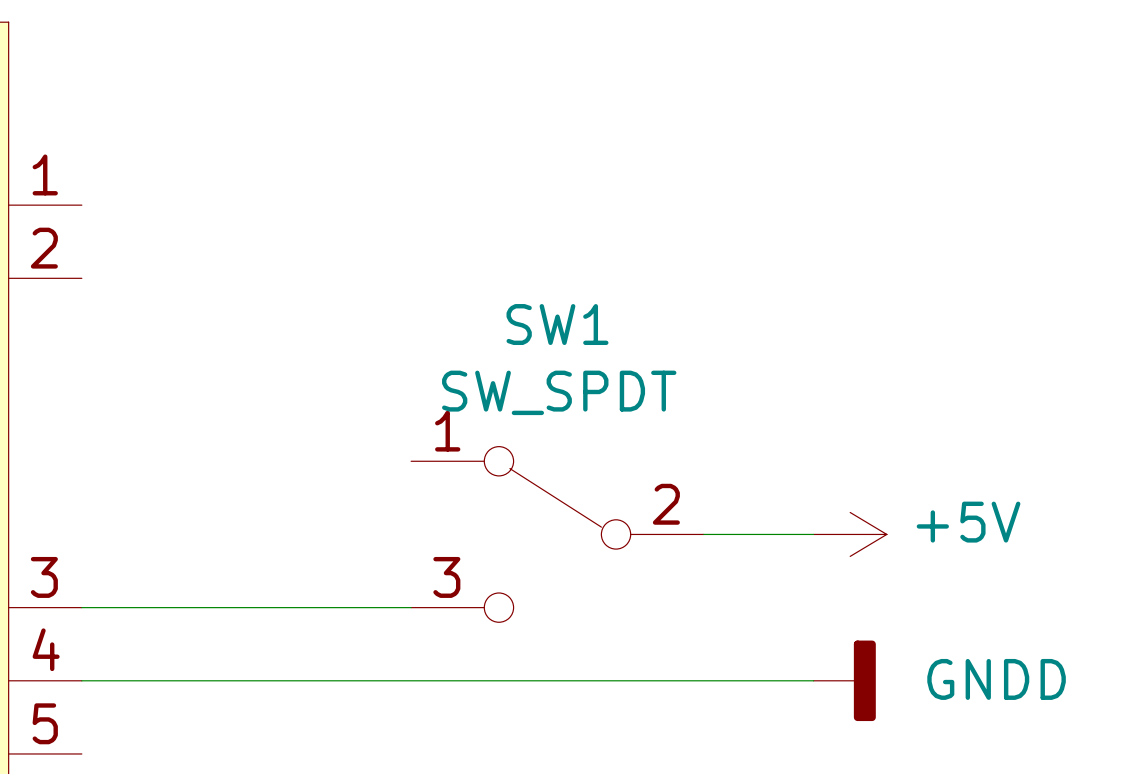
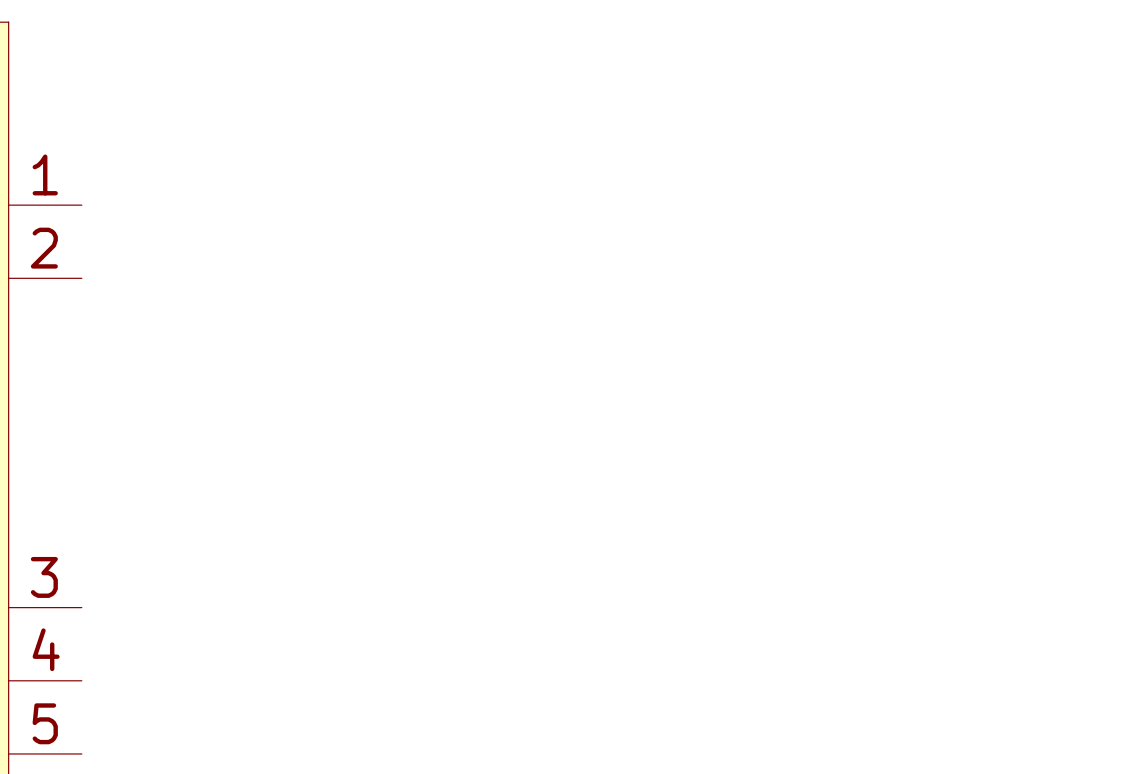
SW1: SW_SPDT (557, 534) -> none
wire: (703, 534) (813, 534) -> none
power symbol: +5V (850, 534) -> none
wire: (81, 607) (411, 607) -> none
wire: (81, 680) (813, 680) -> none
power symbol: GNDD (844, 680) -> none

